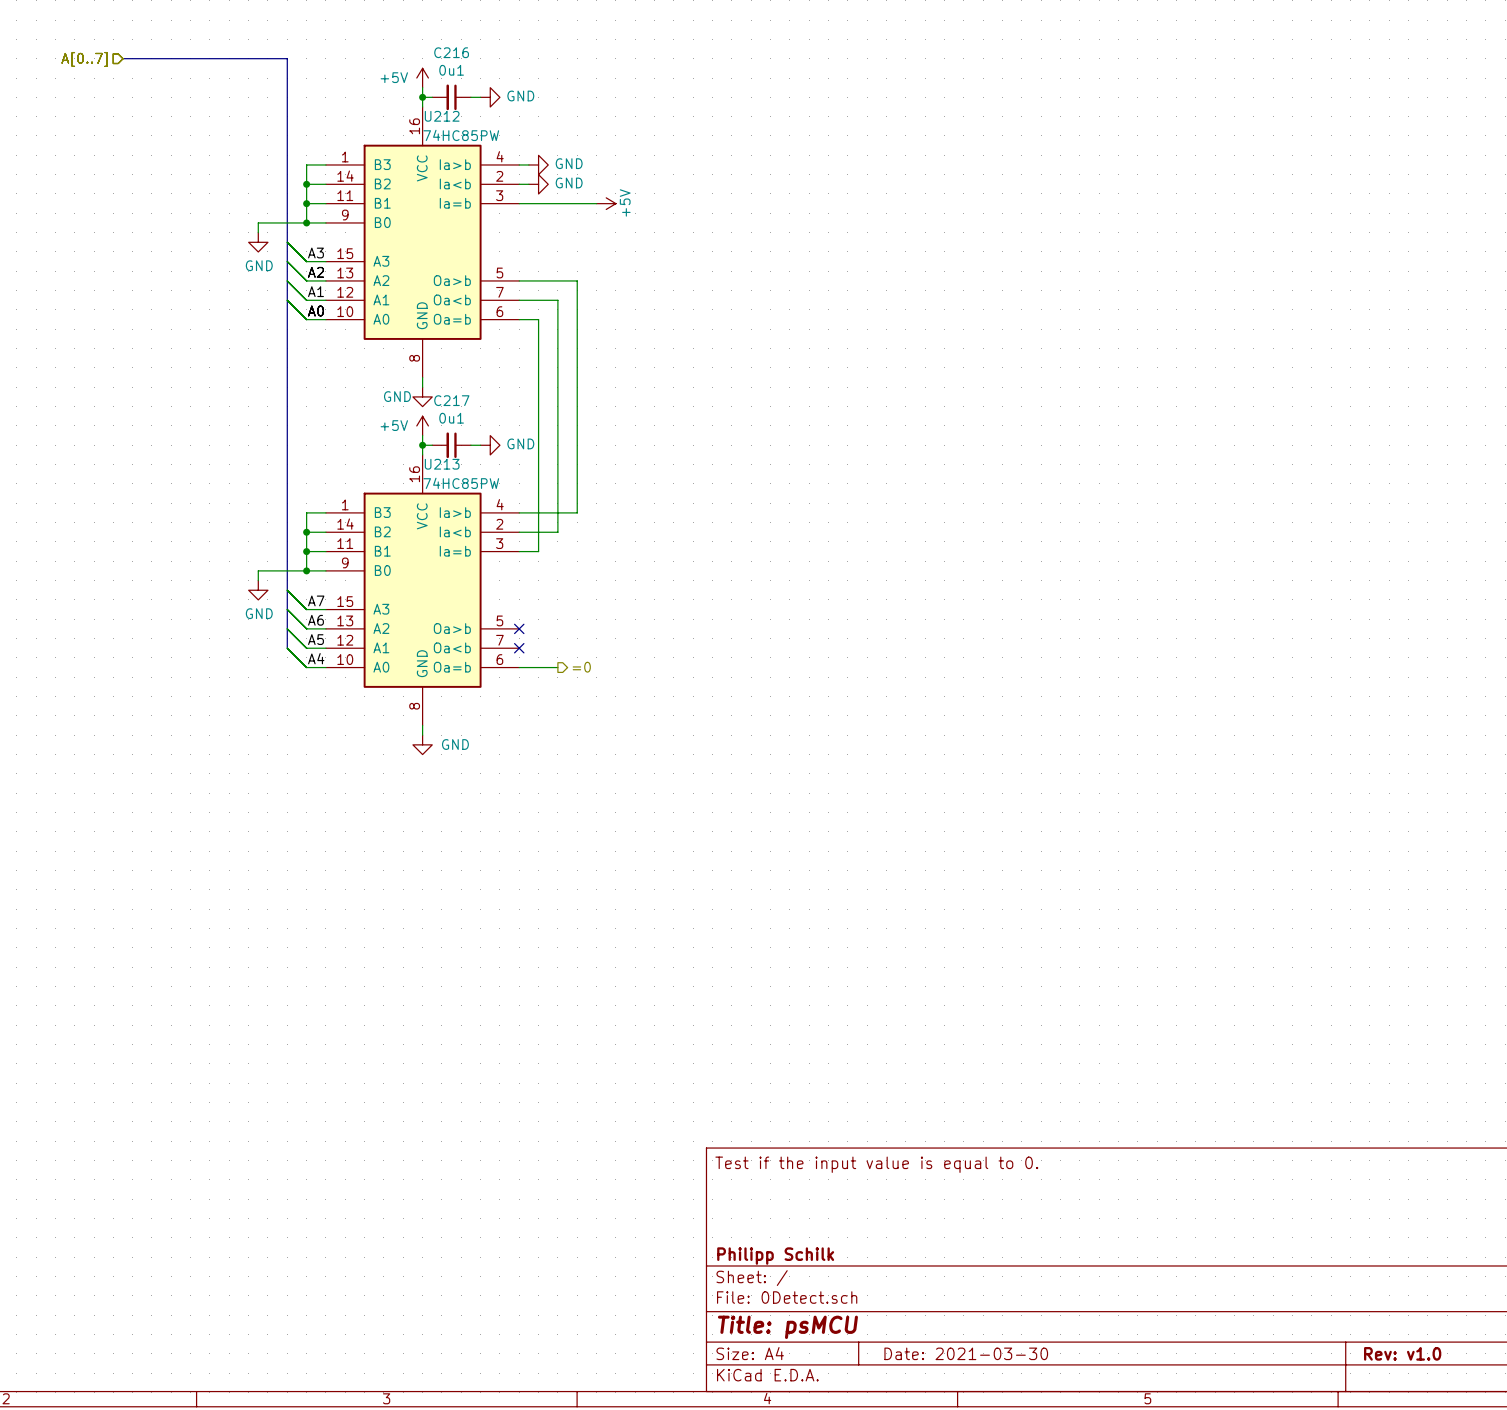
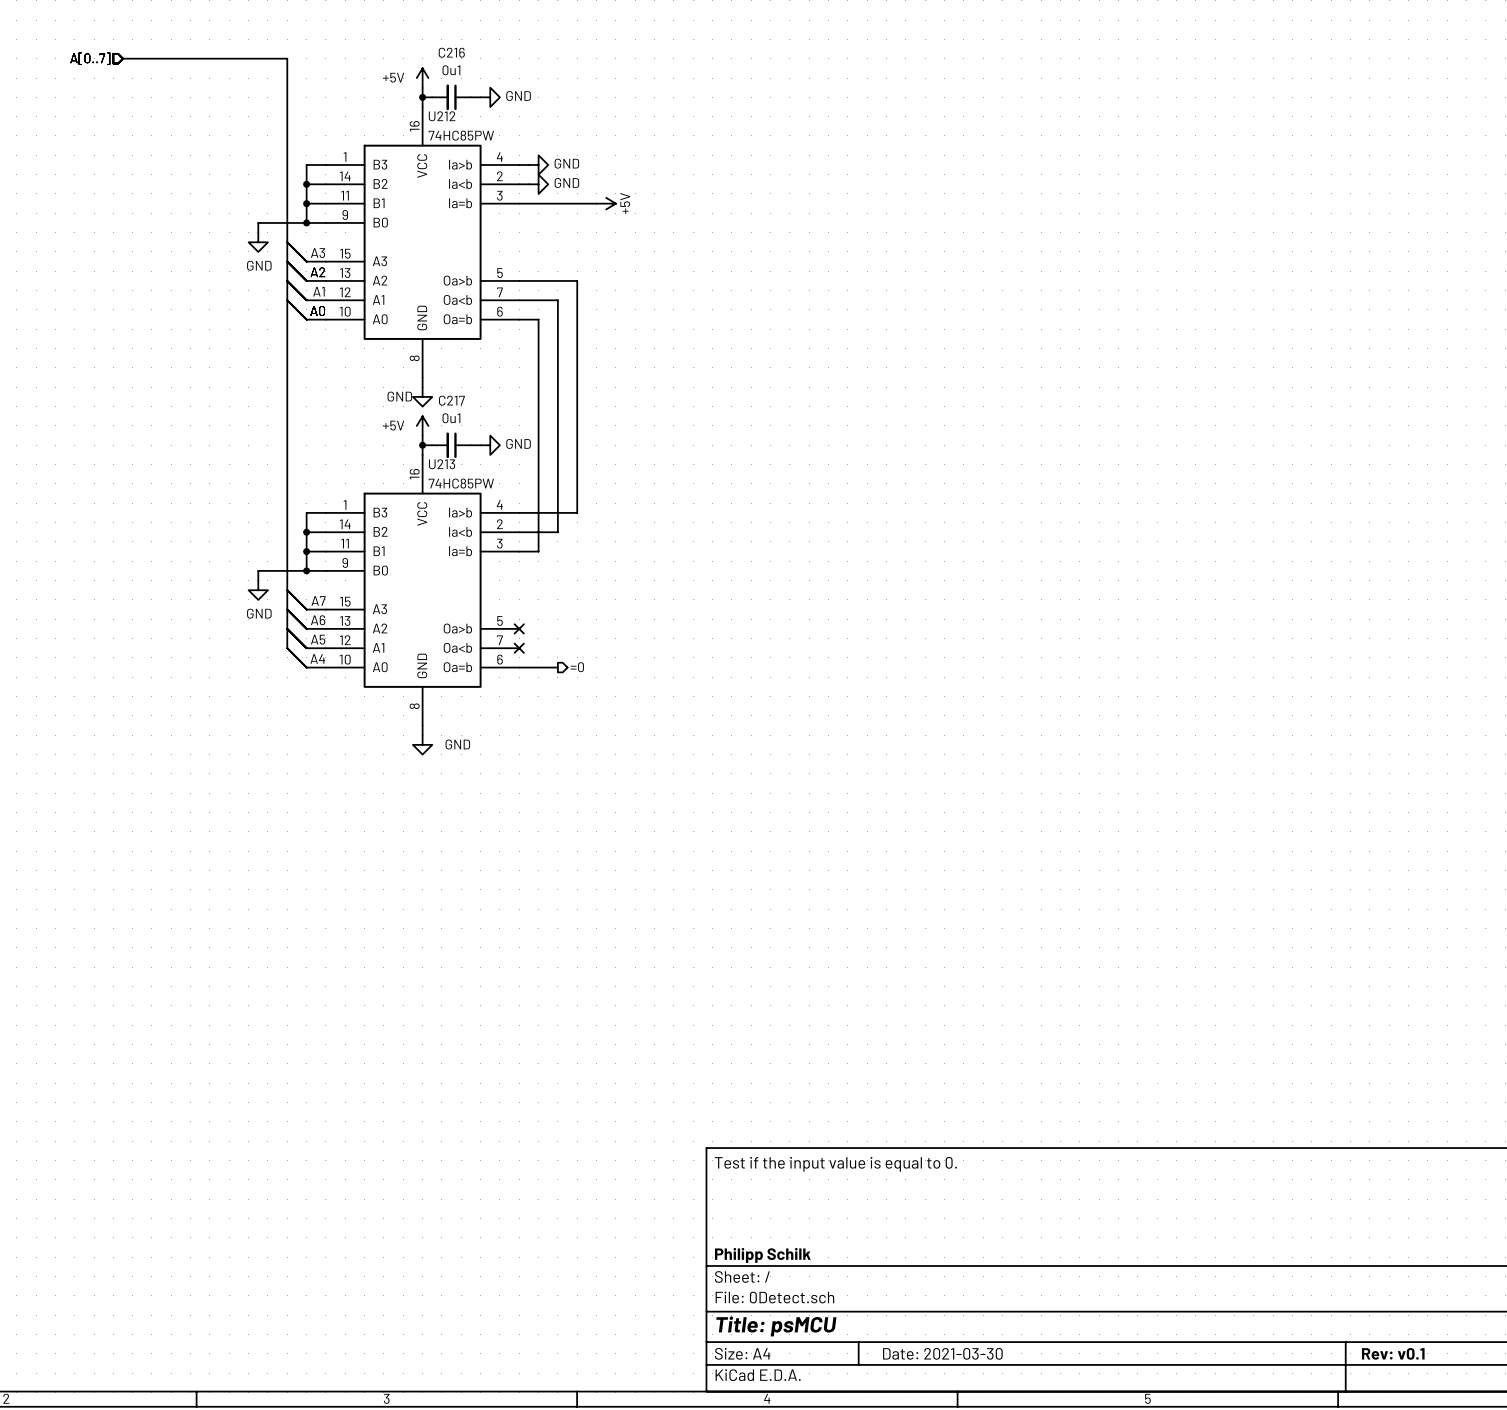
title block: Rev: v1.0 (1402, 1353) -> Rev: v0.1 (1393, 1353)

